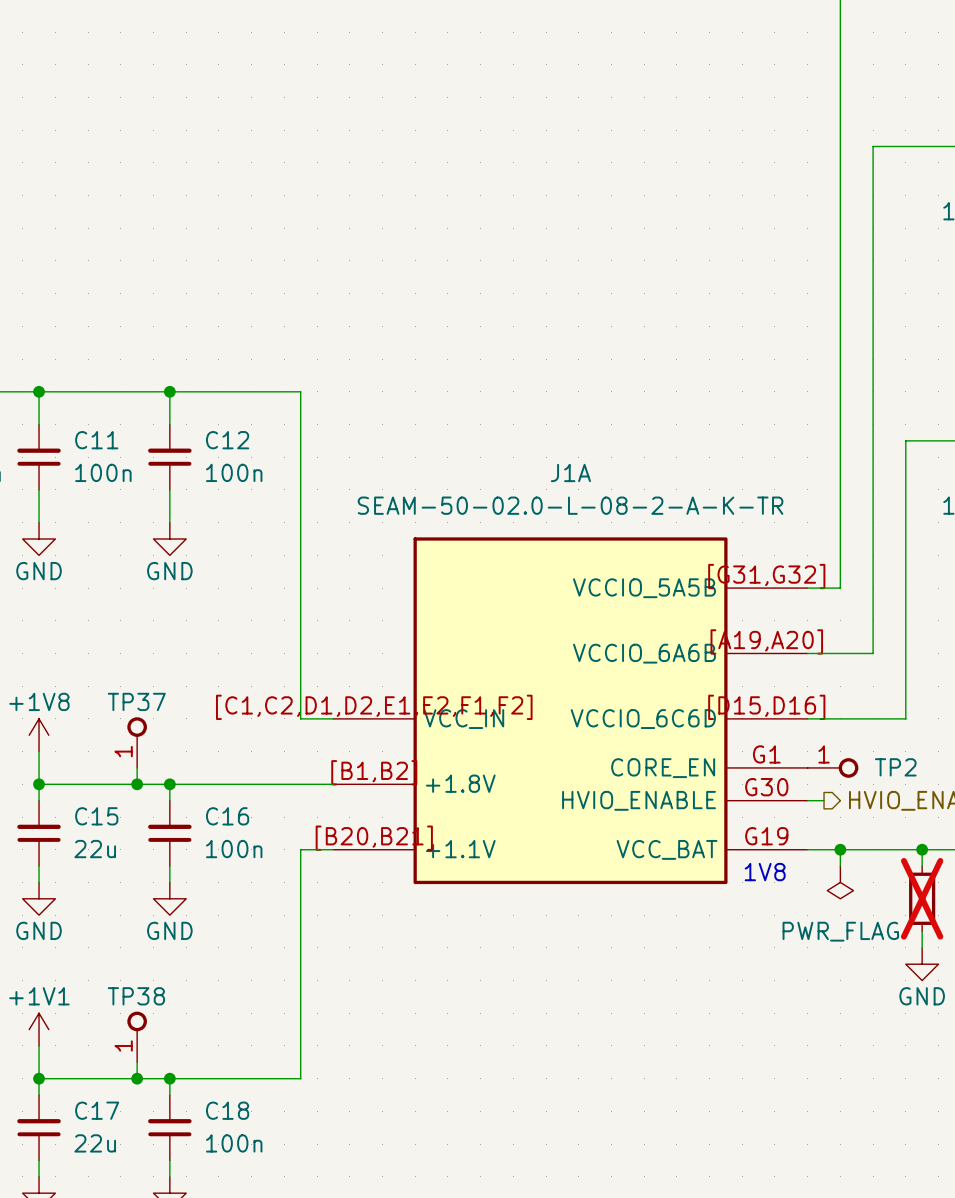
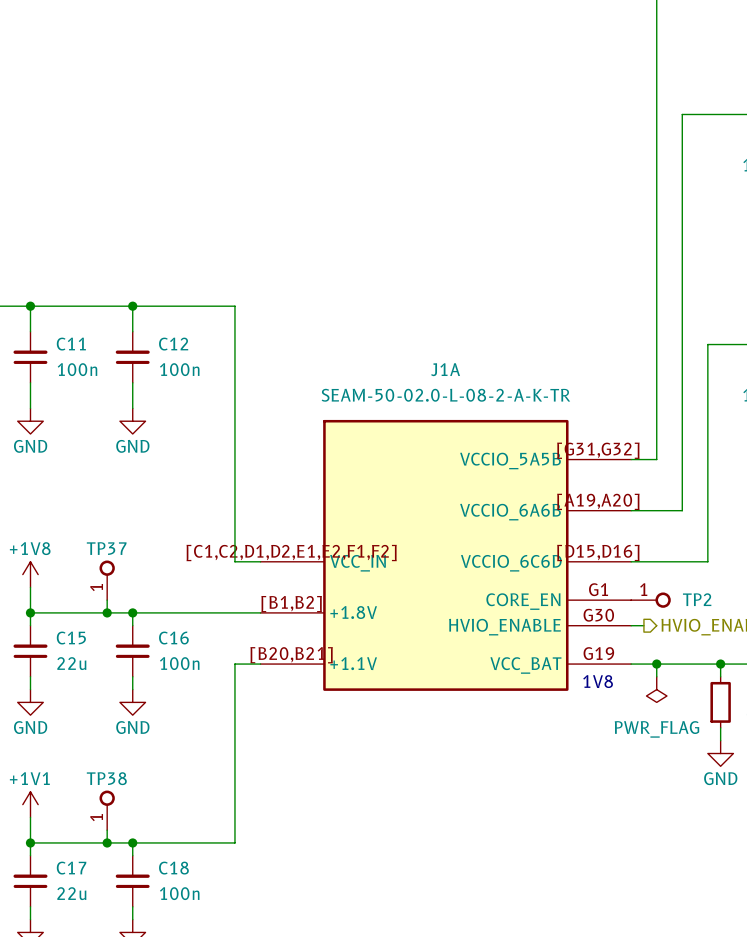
part do-not-place cross: (922, 898) -> none

